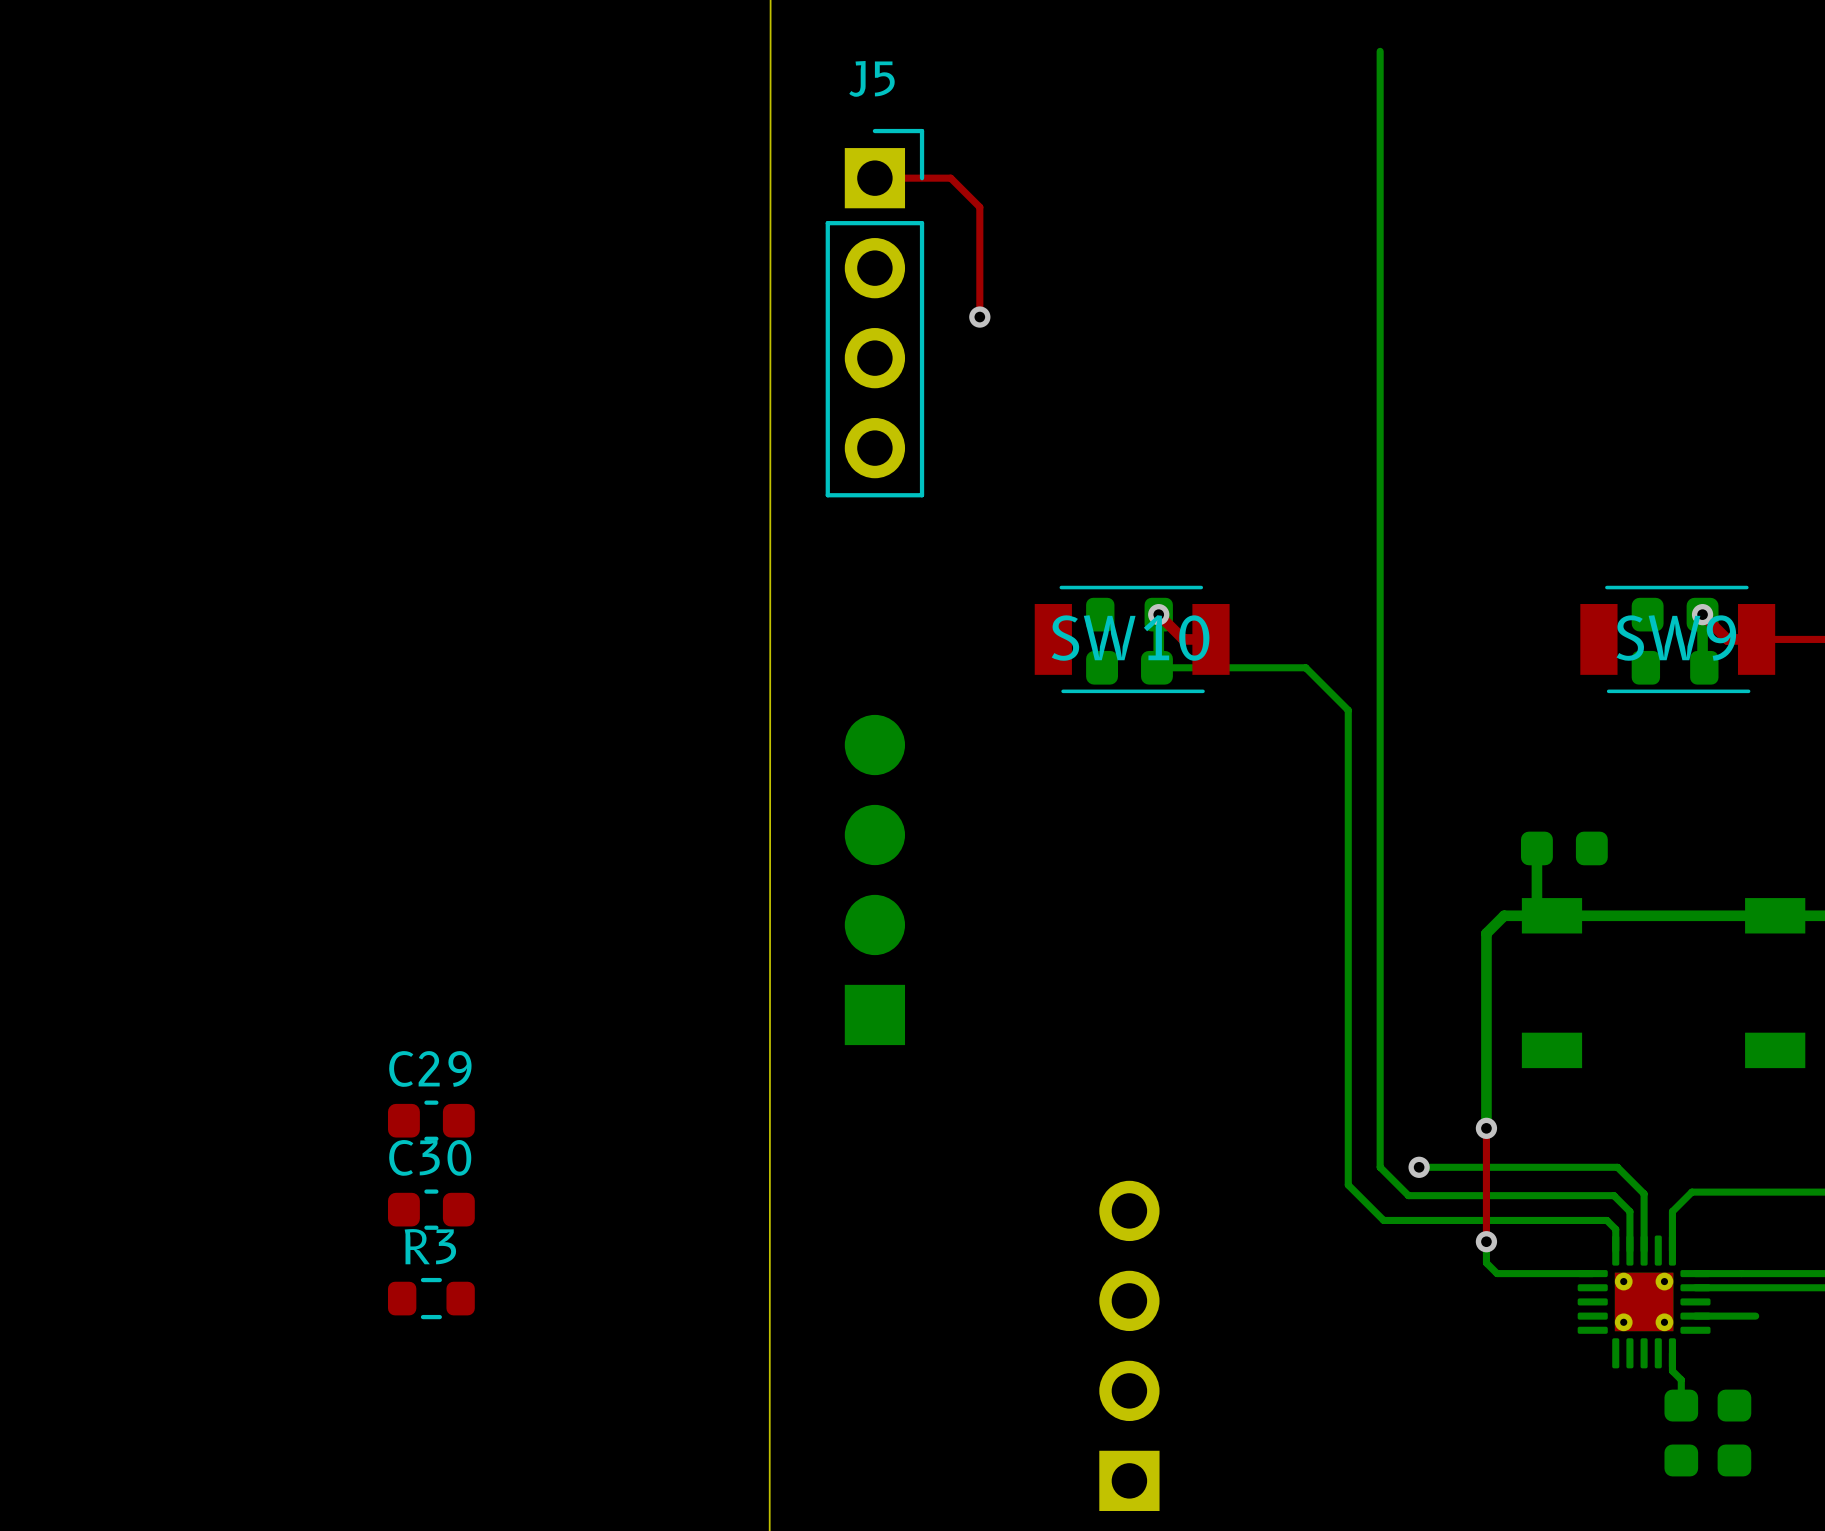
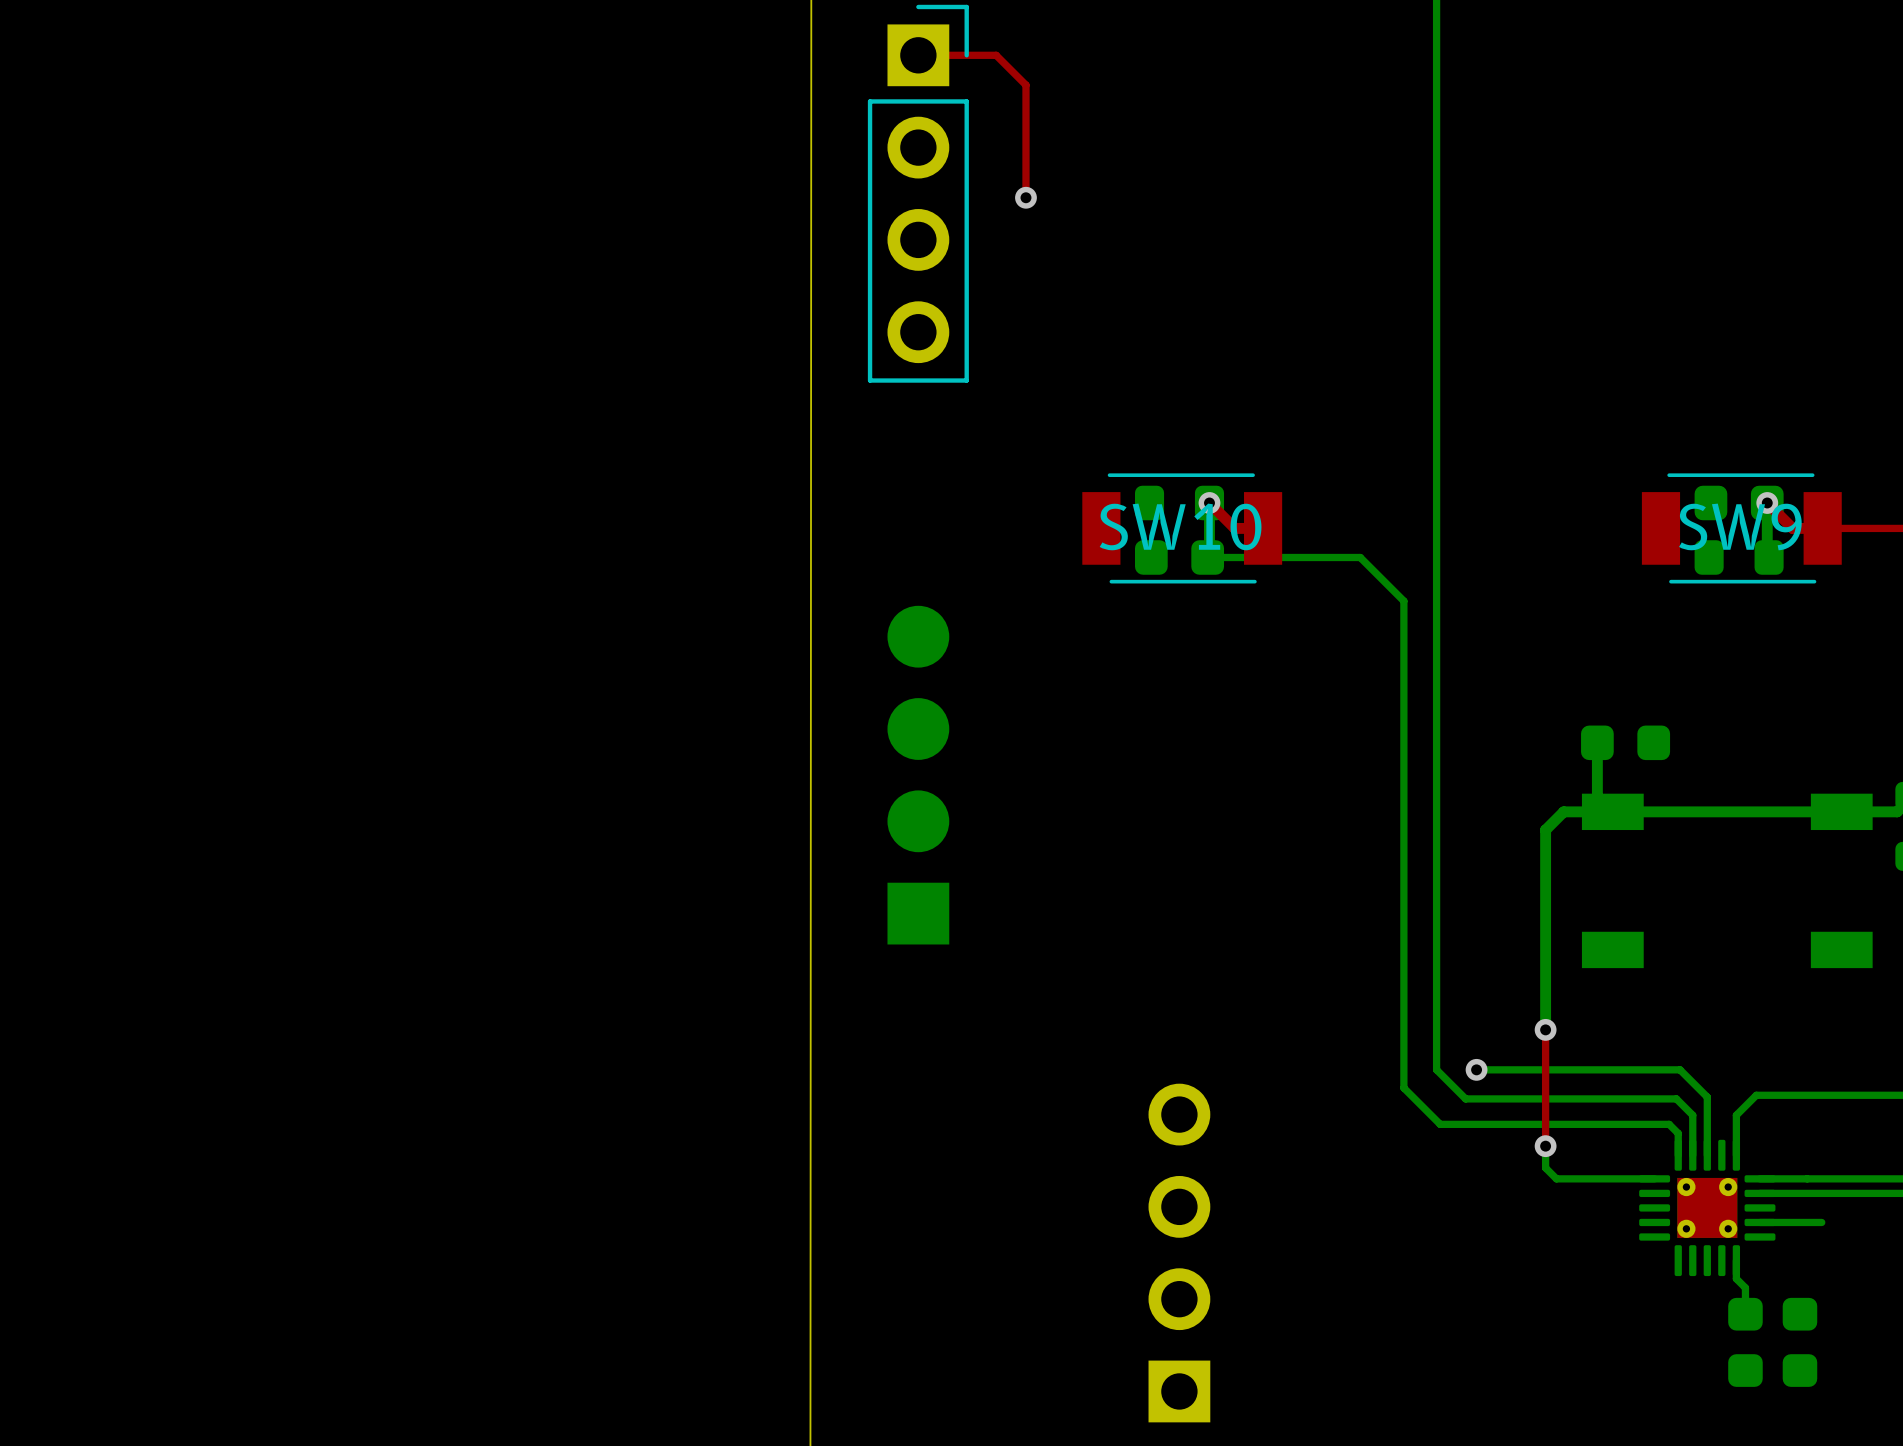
C29: (431, 1120) -> none
C30: (431, 1209) -> none
R3: (431, 1298) -> none

